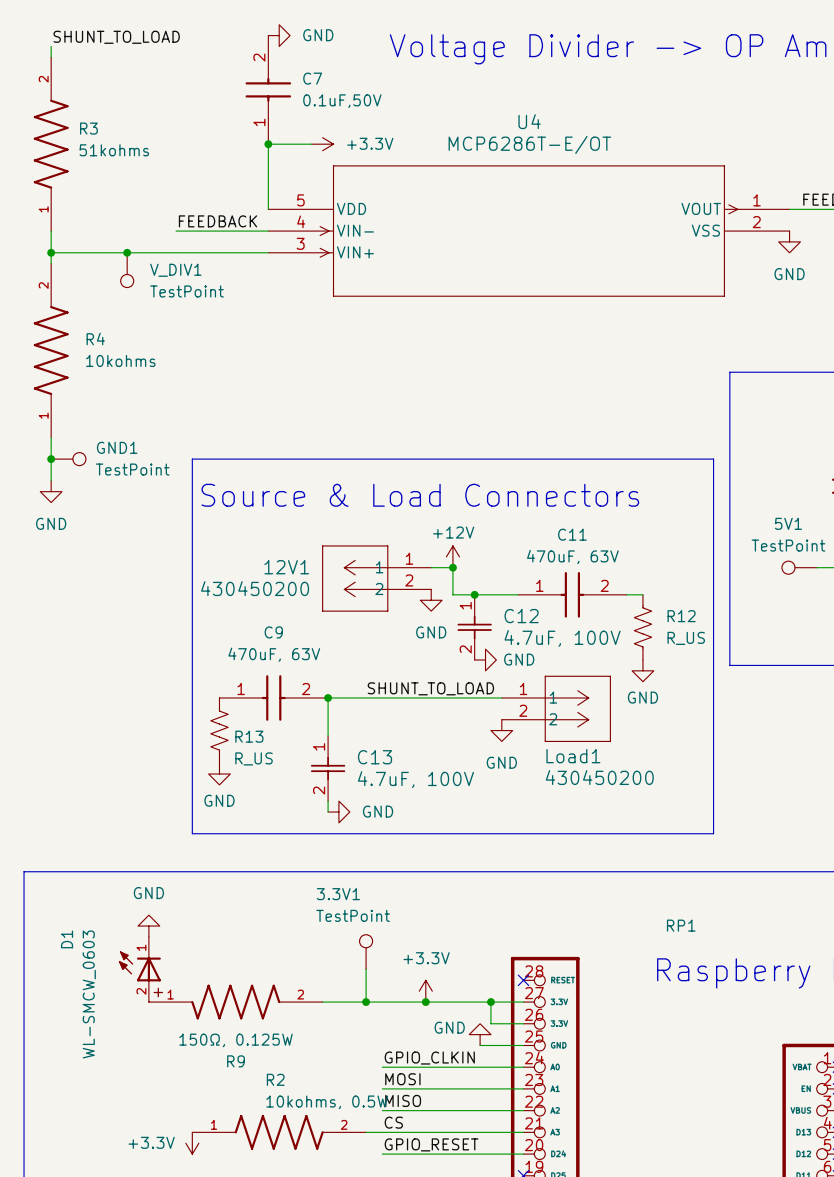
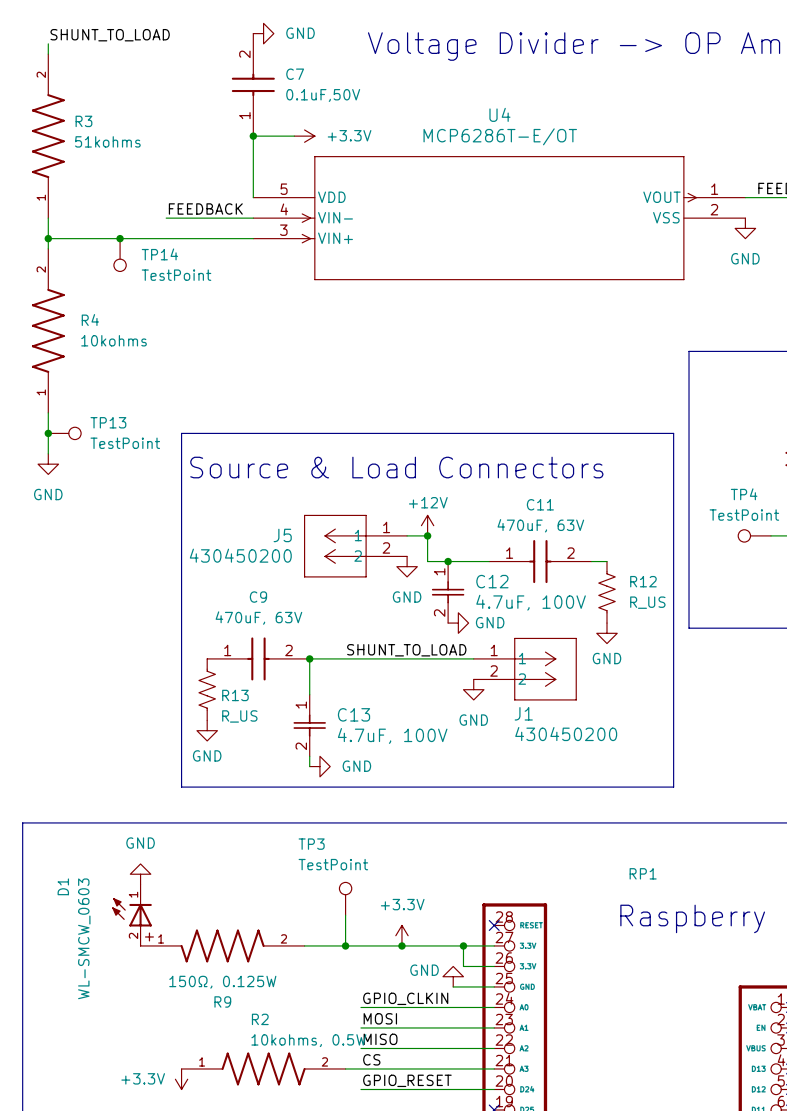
V_DIV1 name: V_DIV1 (175, 270) -> TP14 (159, 254)
GND1 name: GND1 (117, 447) -> TP13 (108, 422)
5V1 name: 5V1 (788, 523) -> TP4 (744, 494)
12V1 name: 12V1 (286, 567) -> J5 (282, 535)
Load1 name: Load1 (573, 756) -> J1 (523, 713)
3.3V1 name: 3.3V1 (338, 894) -> TP3 (311, 844)

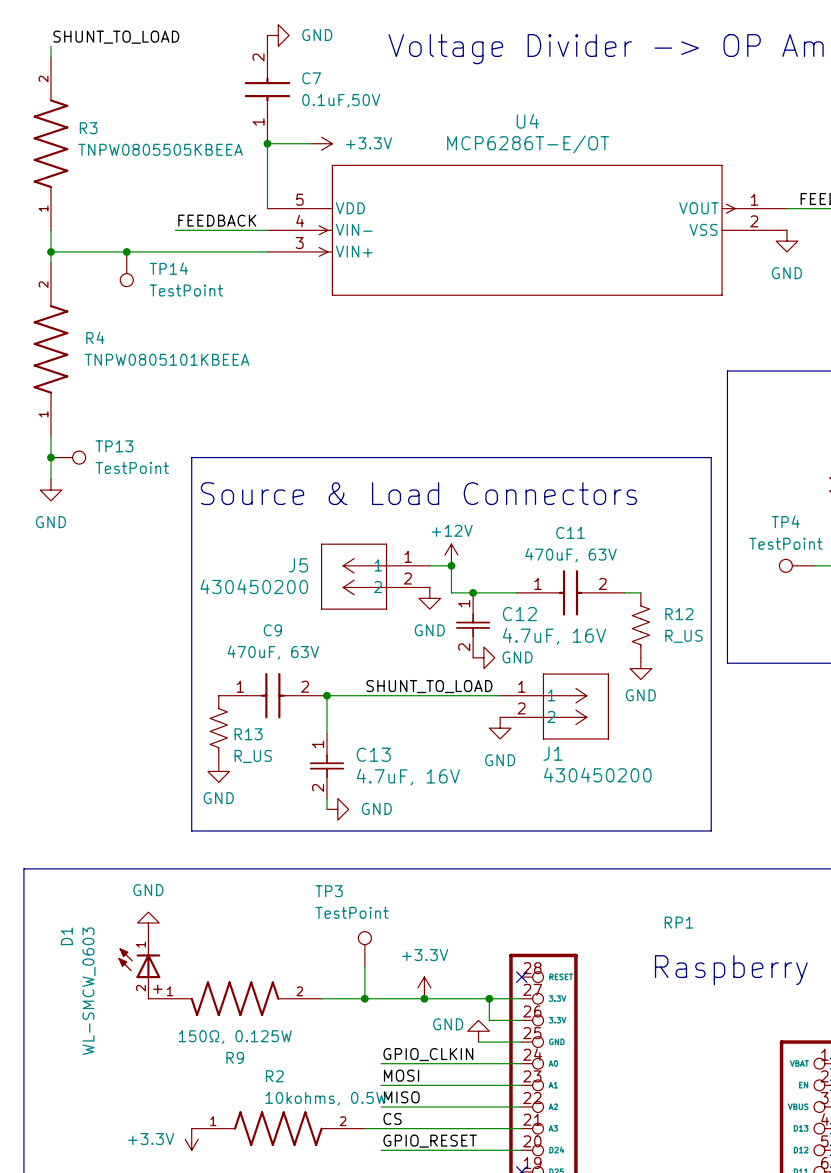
R3 value: 51kohms (107, 141) -> TNPW0805505KBEEA (160, 149)
R4 value: 10kohms (114, 340) -> TNPW0805101KBEEA (167, 359)
C12 value: 4.7uF, 100V (531, 602) -> 4.7uF, 16V (554, 636)
C13 value: 4.7uF, 100V (392, 735) -> 4.7uF, 16V (408, 777)

